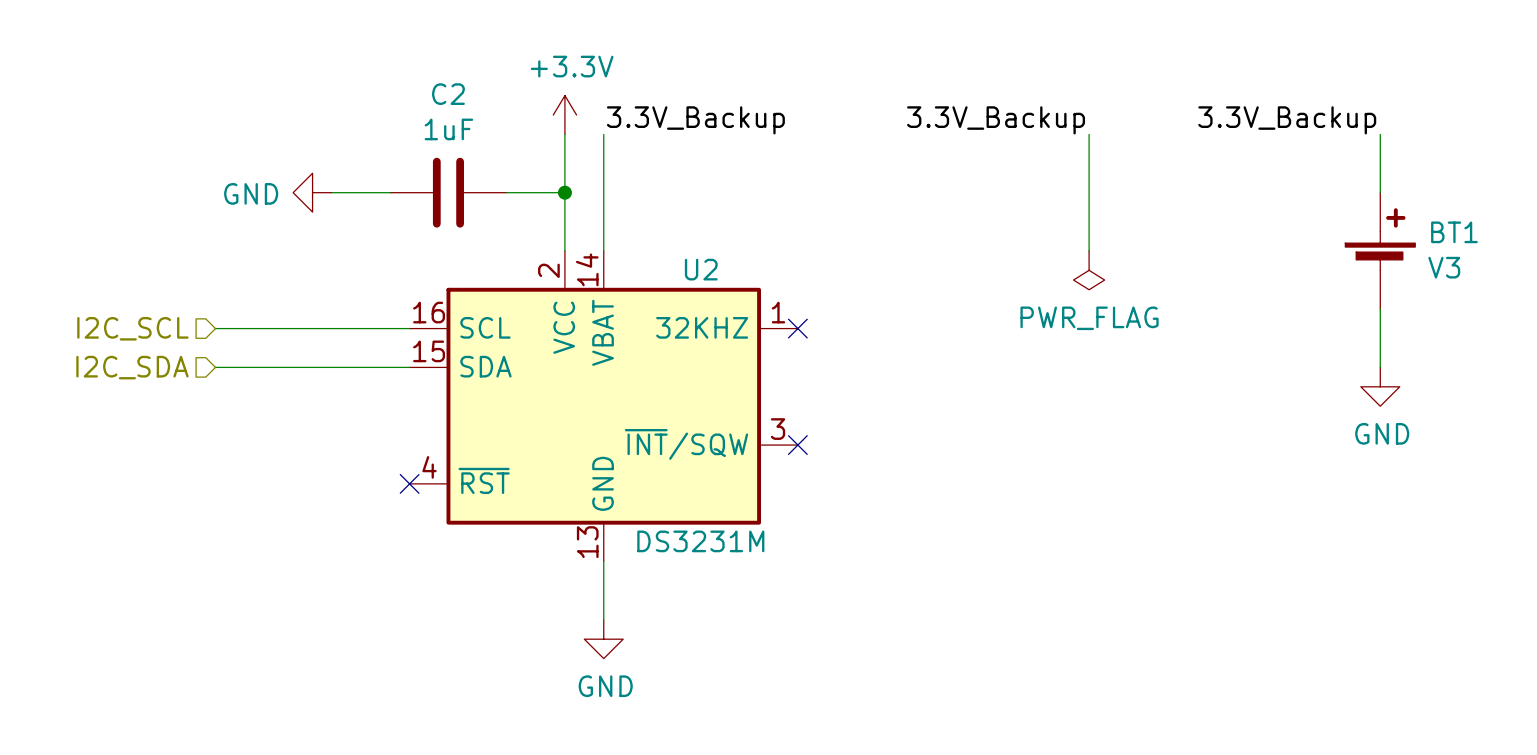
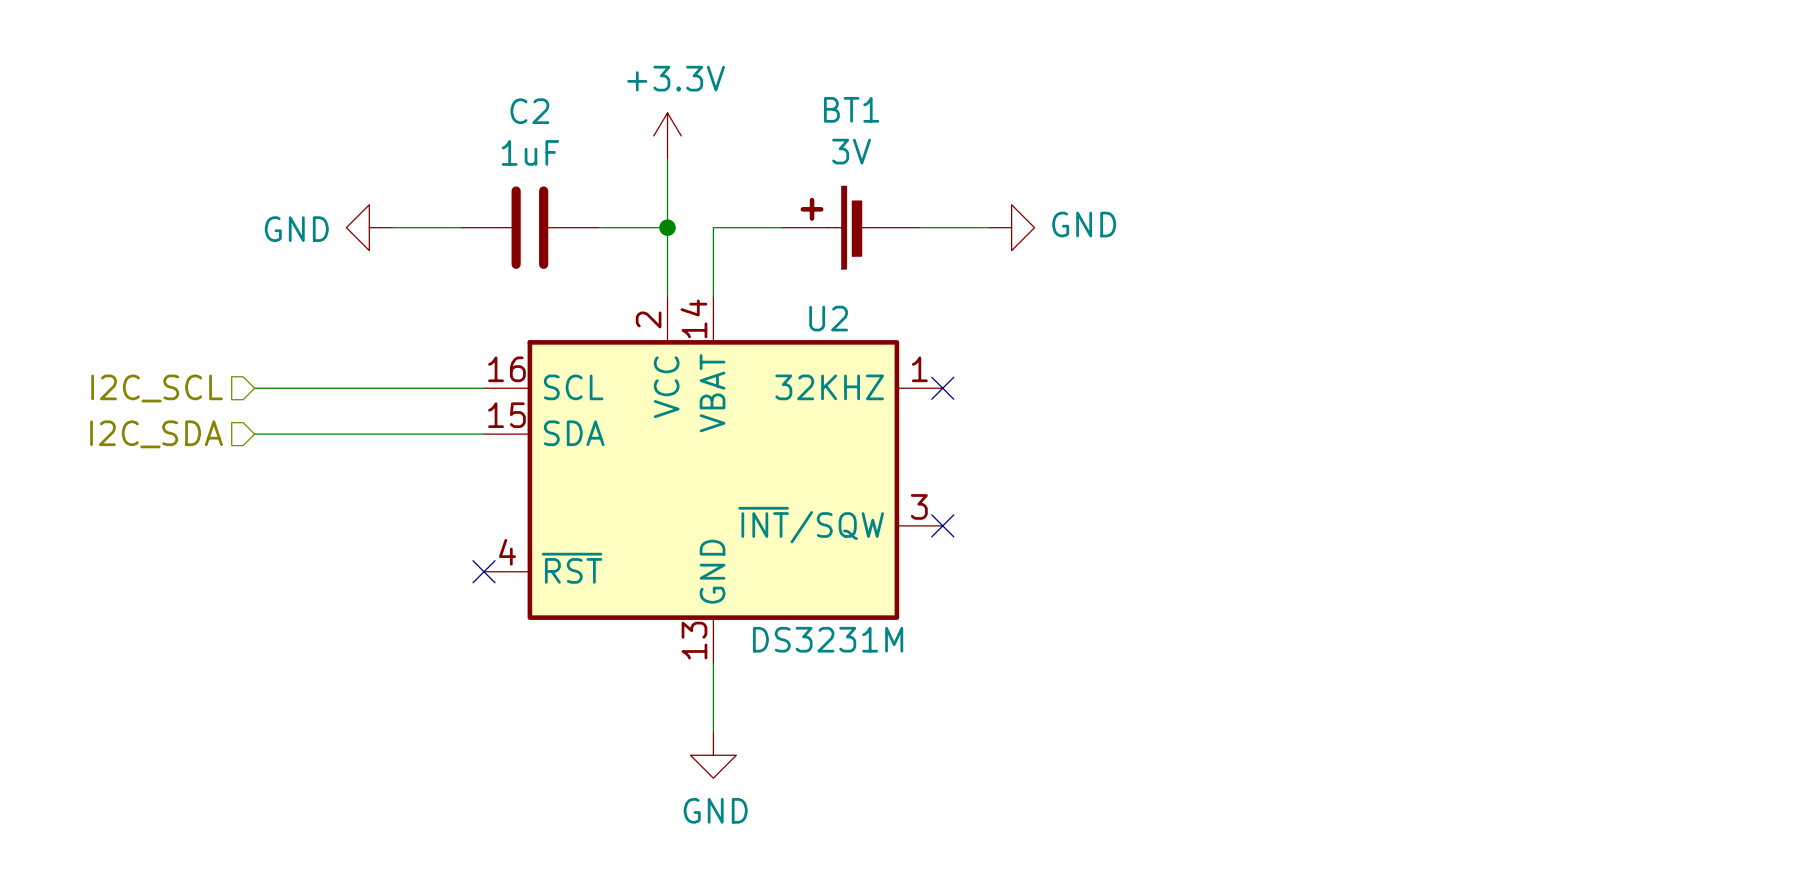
label: 3.3V_Backup (695, 120) -> none
label: 3.3V_Backup (996, 120) -> none
label: 3.3V_Backup (1287, 120) -> none
wire: (603, 134) (603, 192) -> (782, 227) (713, 227)
wire: (1089, 134) (1089, 250) -> none
wire: (1380, 134) (1380, 192) -> none
wire: none -> (919, 227) (988, 227)
power symbol: none -> GND (1011, 227)
BT1 rotation: 0° (1380, 239) -> 90° counterclockwise (837, 227)
BT1 position: (1380, 250) -> (851, 227)
BT1 value: V3 (1444, 267) -> 3V (851, 151)
power symbol: PWR_FLAG (1089, 270) -> none
wire: (1380, 309) (1380, 367) -> none
power symbol: GND (1380, 386) -> none

